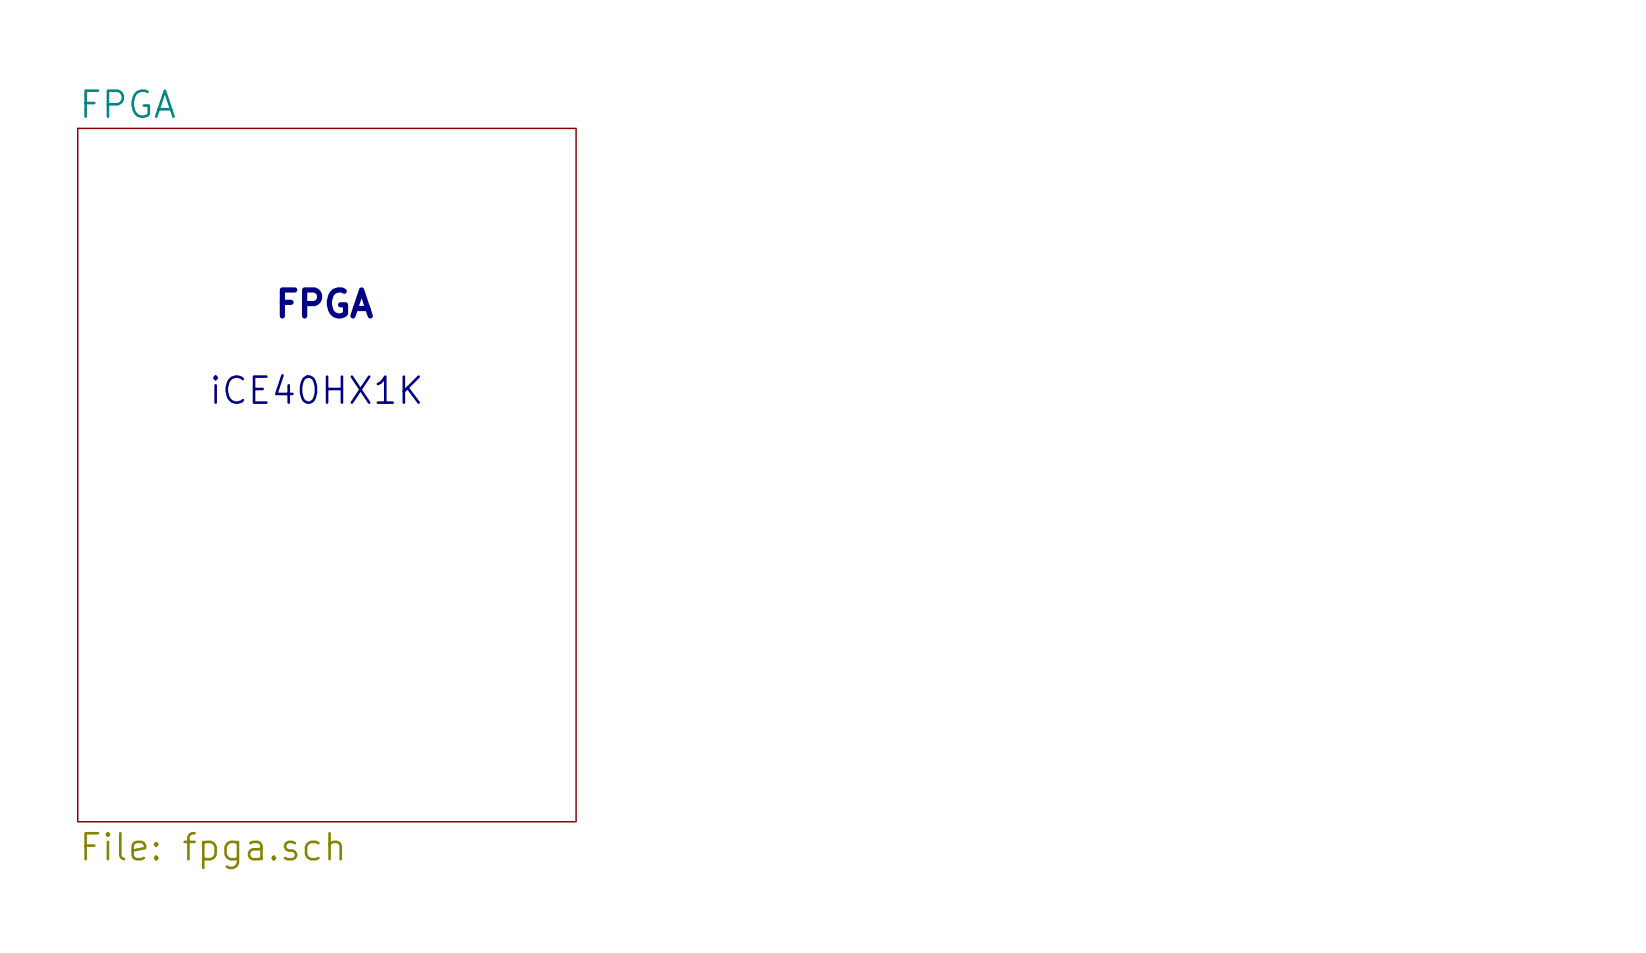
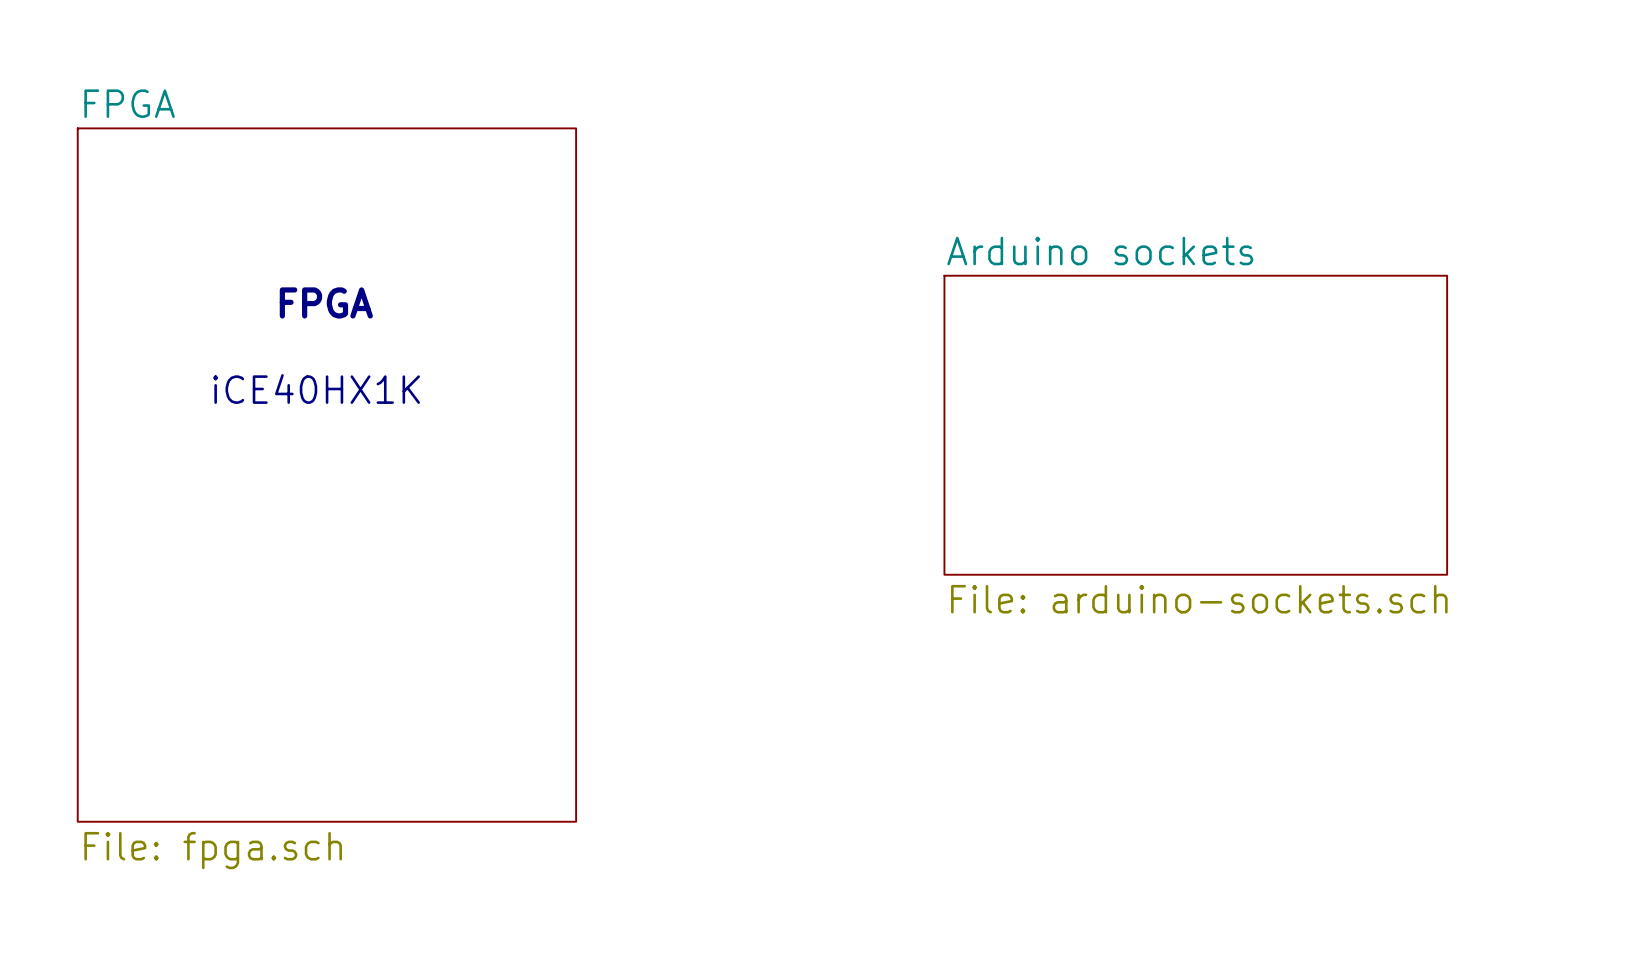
sheet Arduino sockets: none -> File: arduino-sockets.sch (1195, 425)

